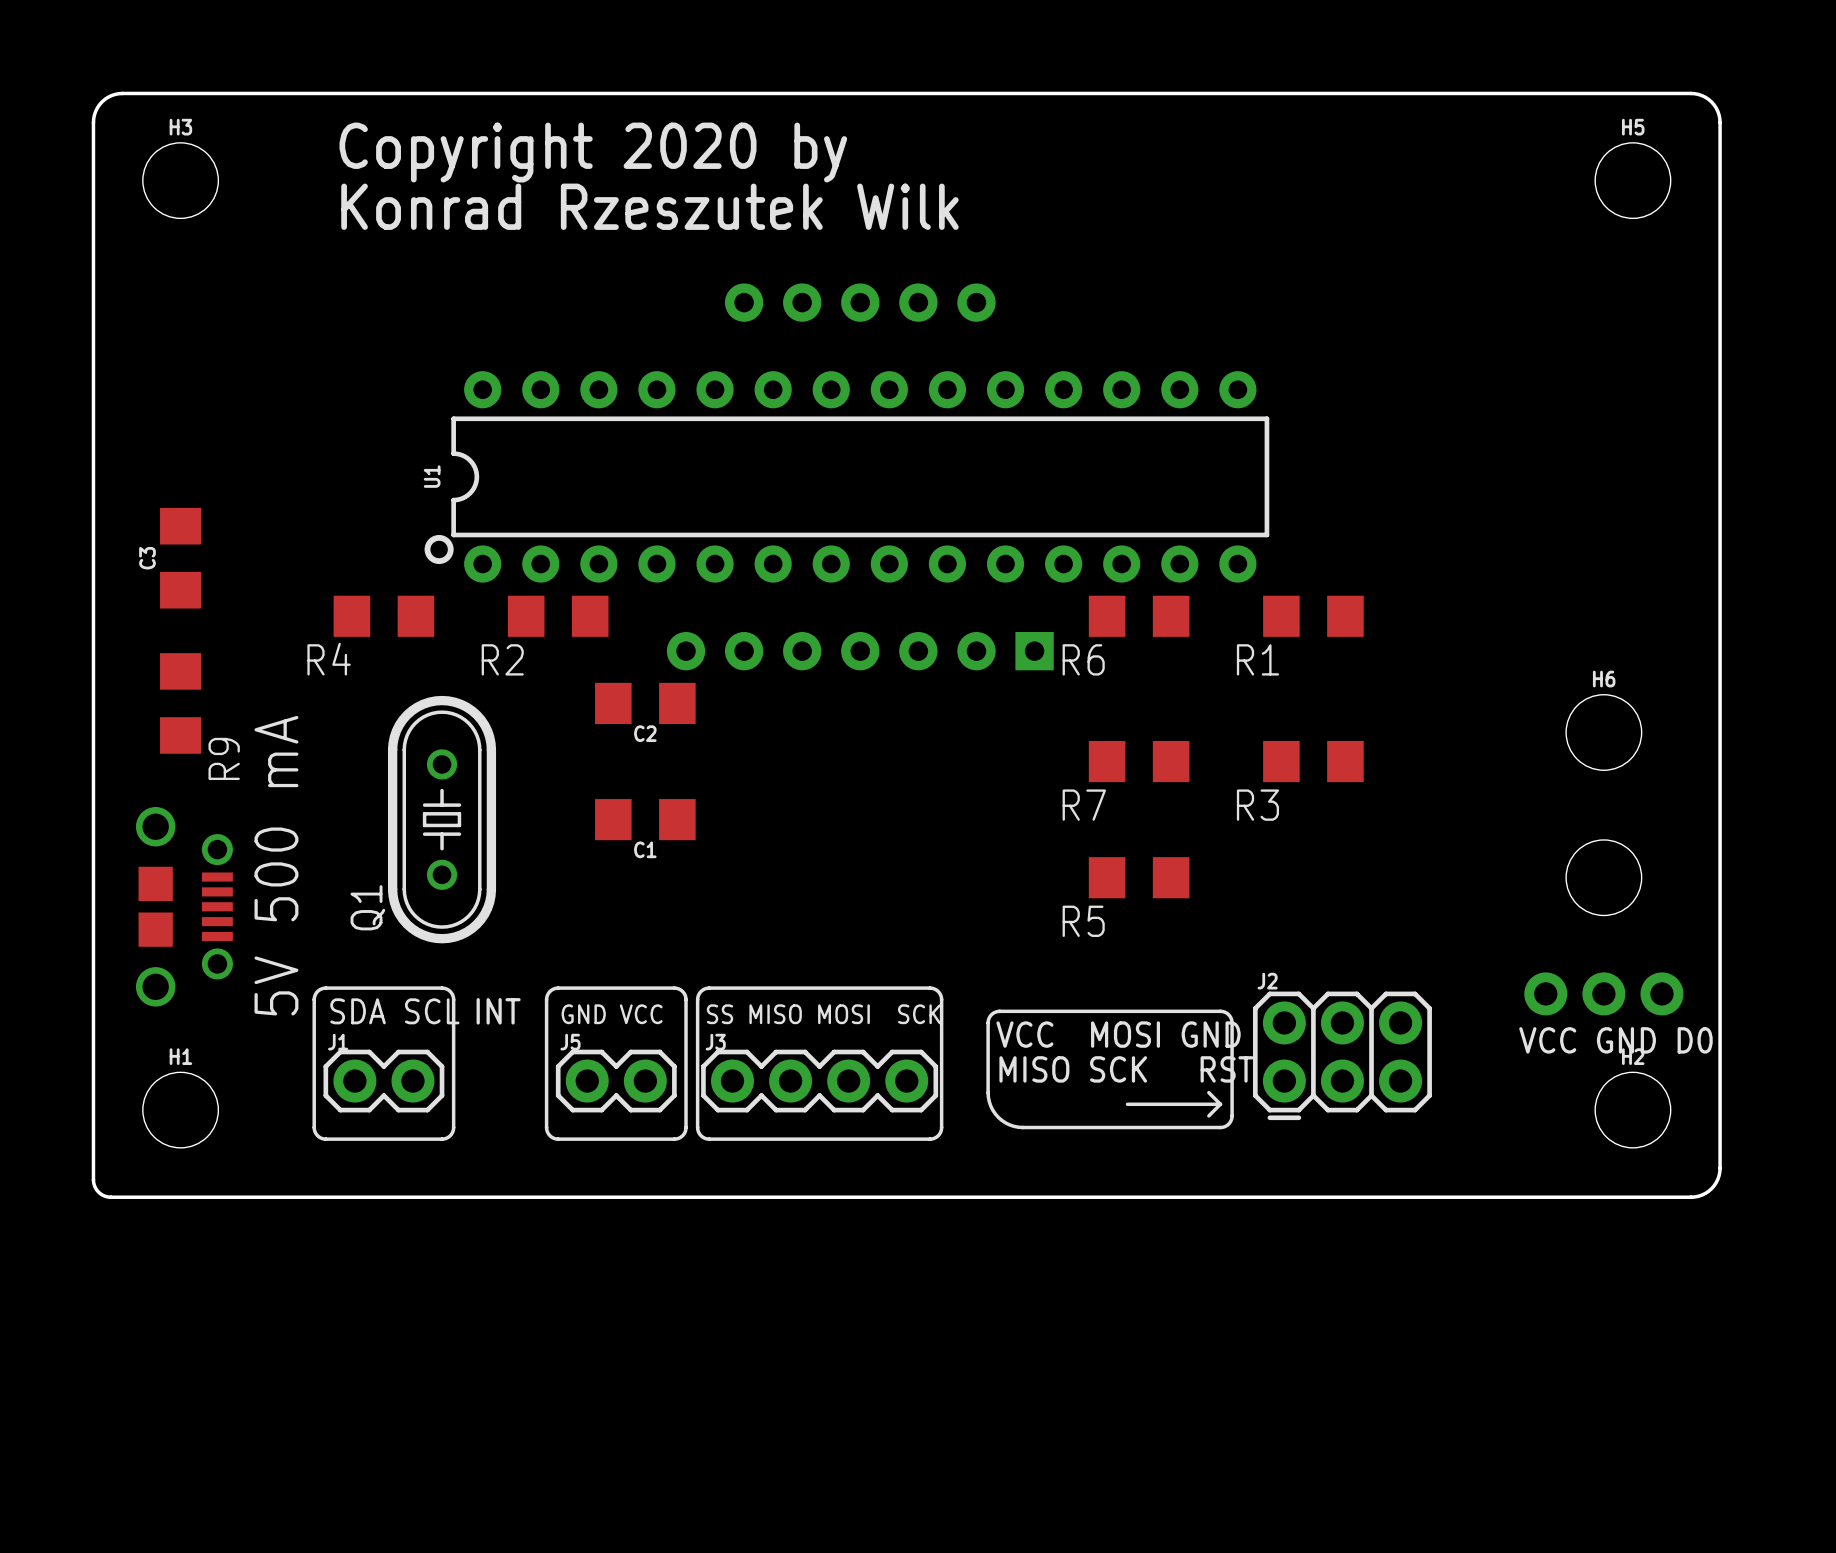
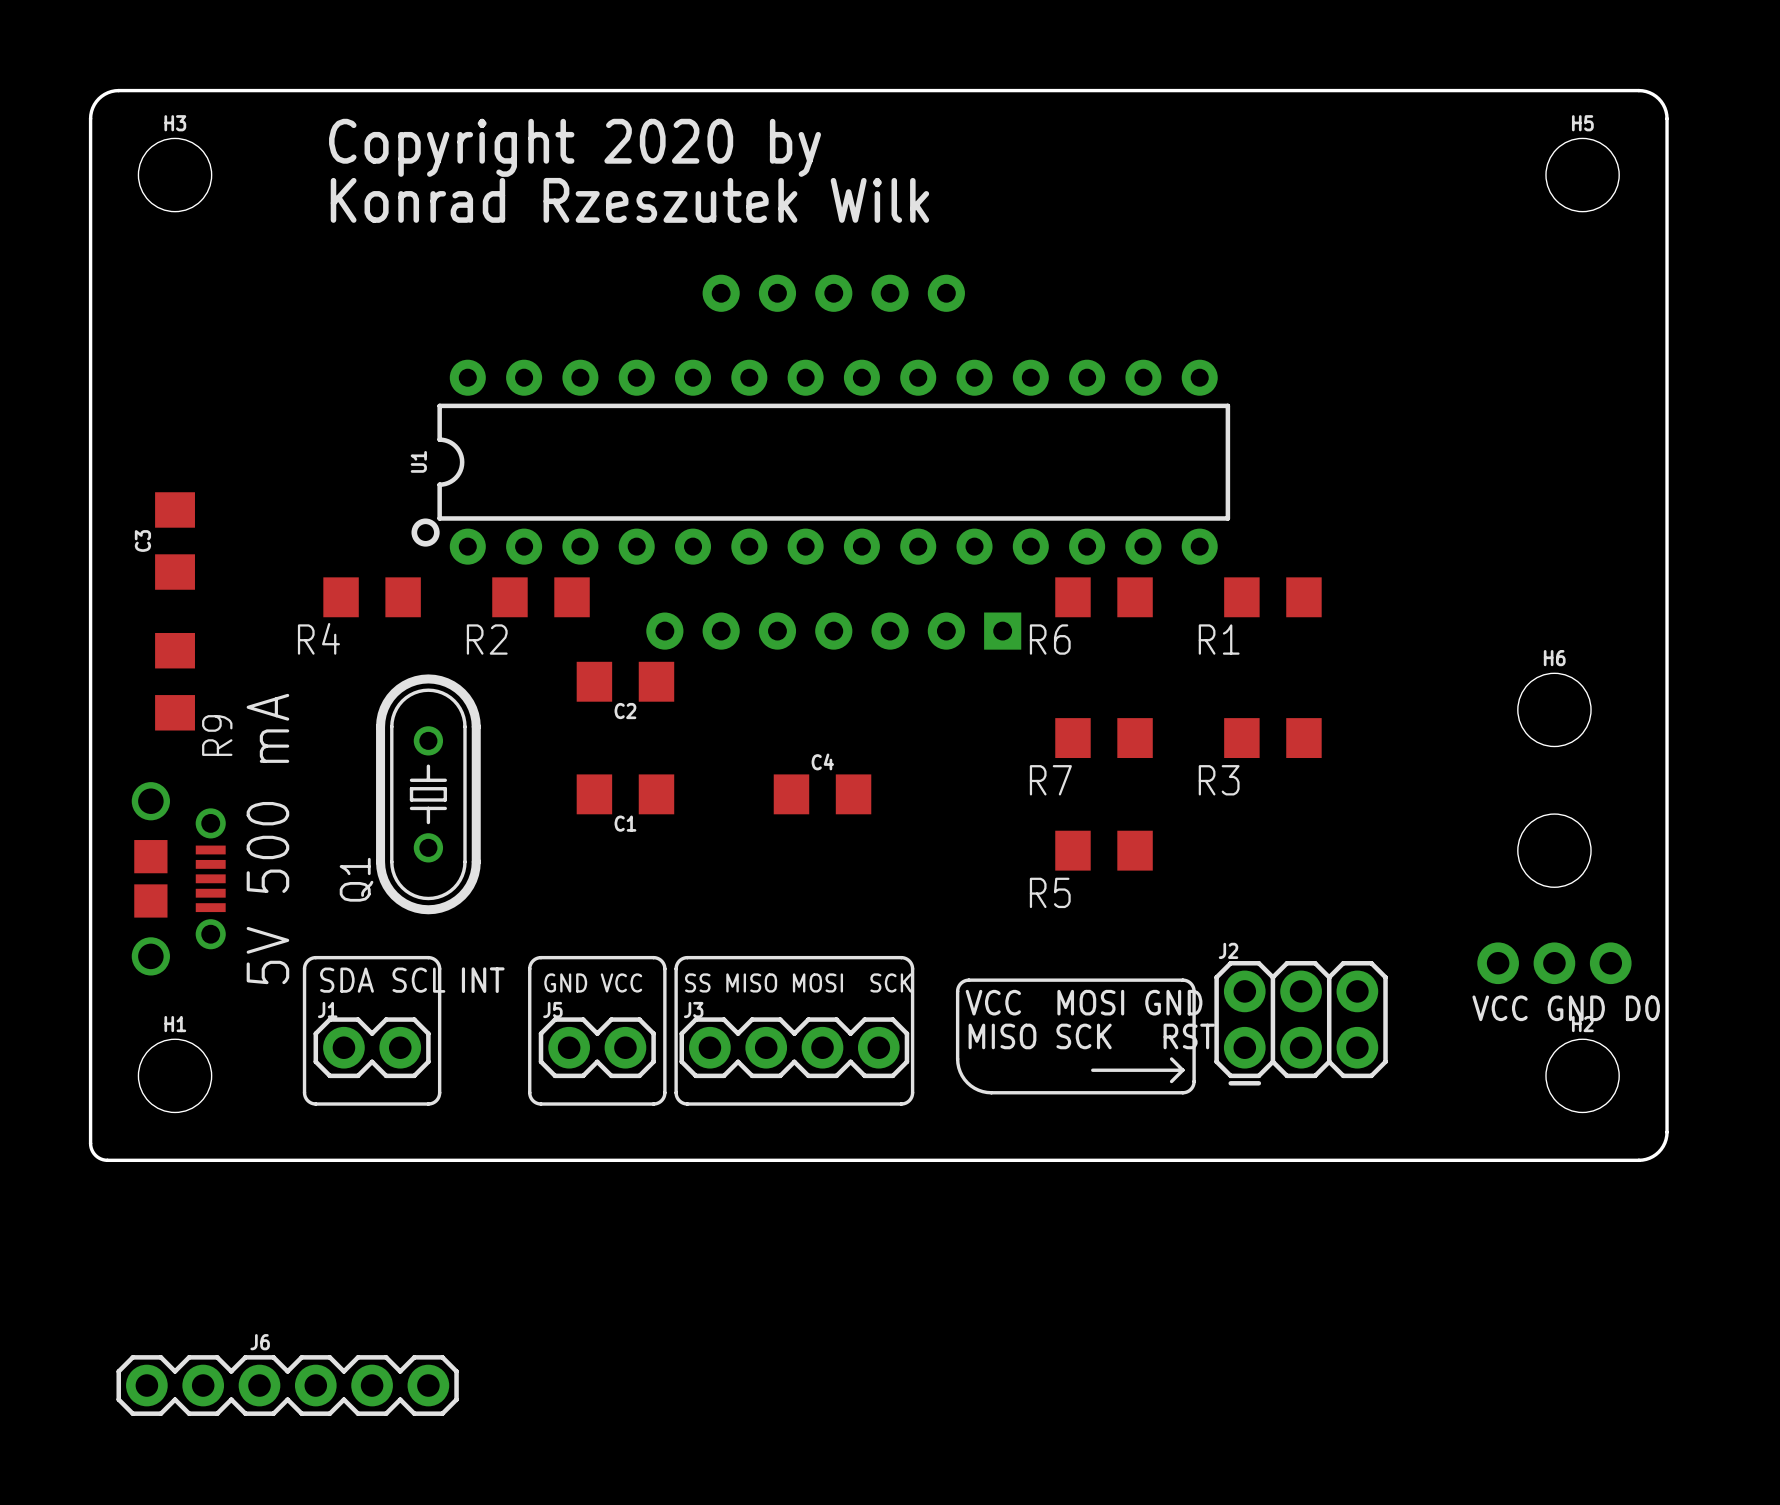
C4: none -> (822, 794)
J6: none -> (287, 1385)

